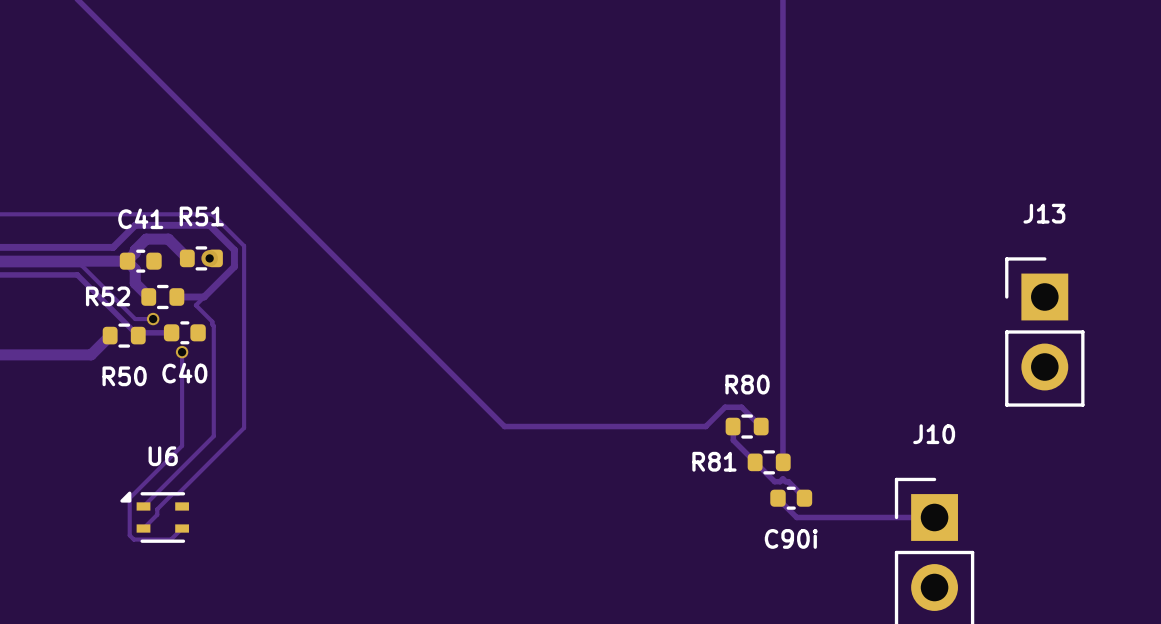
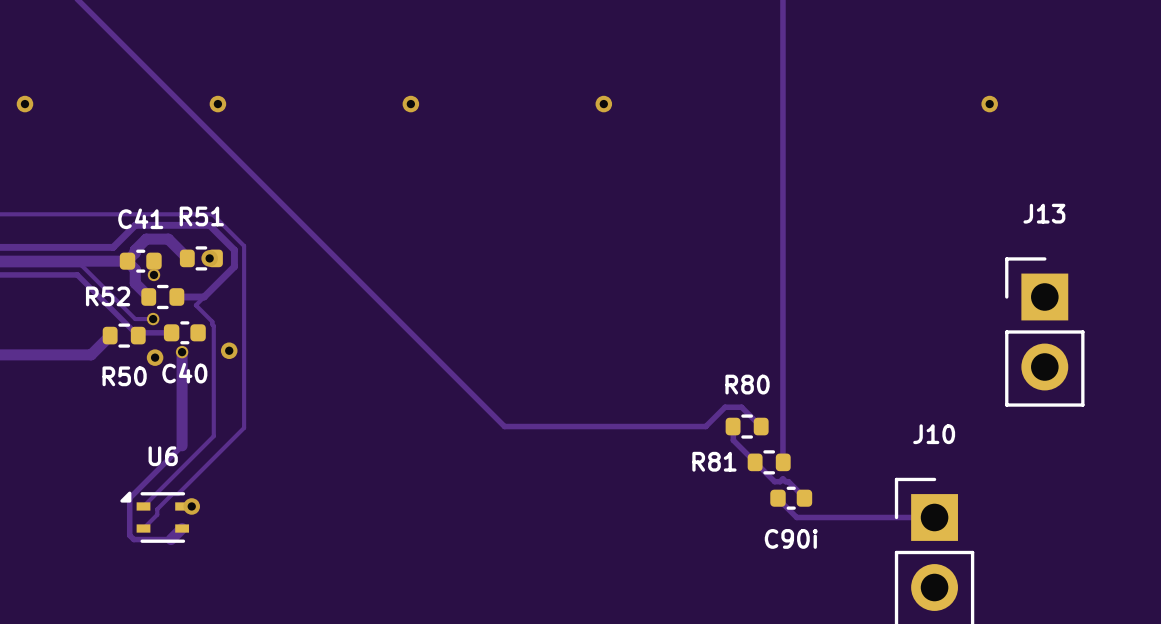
via: none -> (24, 104)
via: none -> (217, 104)
via: none -> (410, 104)
via: none -> (603, 104)
via: none -> (989, 104)
via: none -> (153, 274)
via: none -> (229, 350)
track width: thin (182, 352) (182, 445) (129, 498) (129, 535) (133, 539) (171, 539) (182, 528) -> thick (182, 352) (182, 445) (129, 498) (129, 535) (133, 539) (171, 539) (182, 528)
via: none -> (155, 357)
via: none -> (191, 506)

